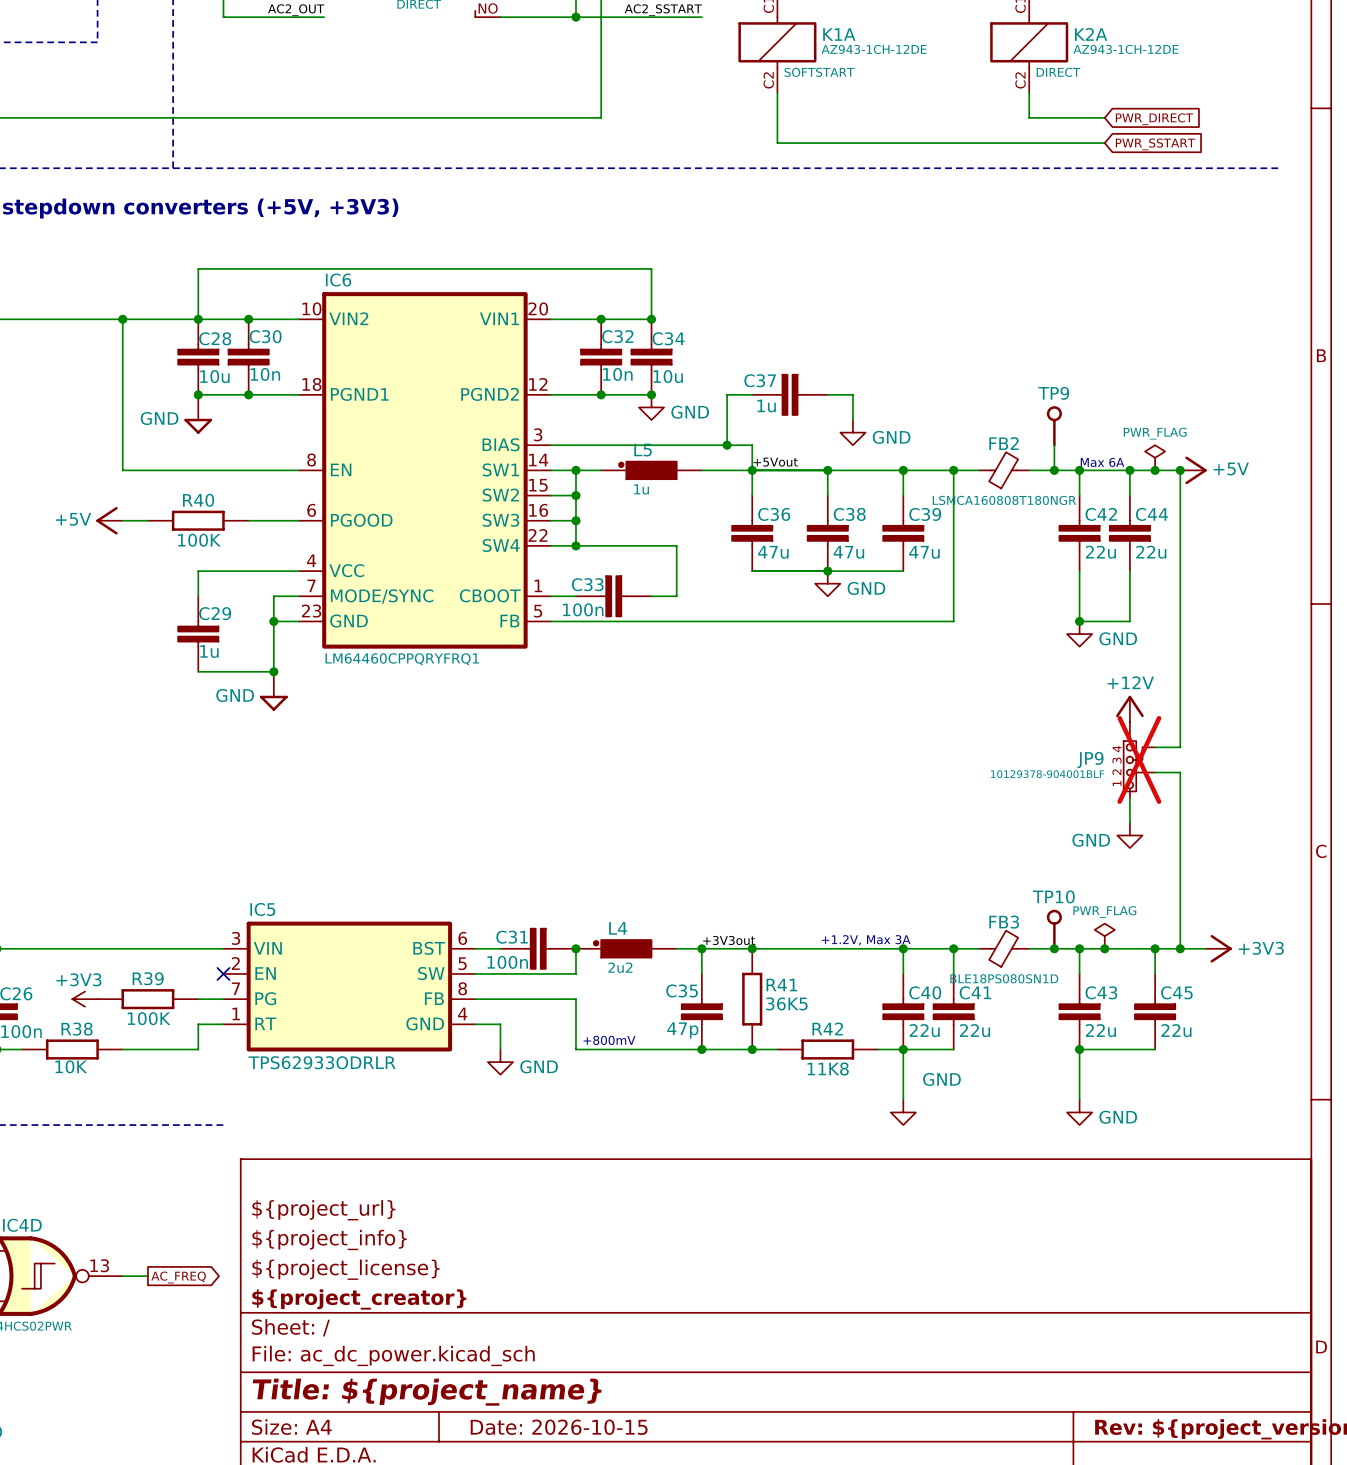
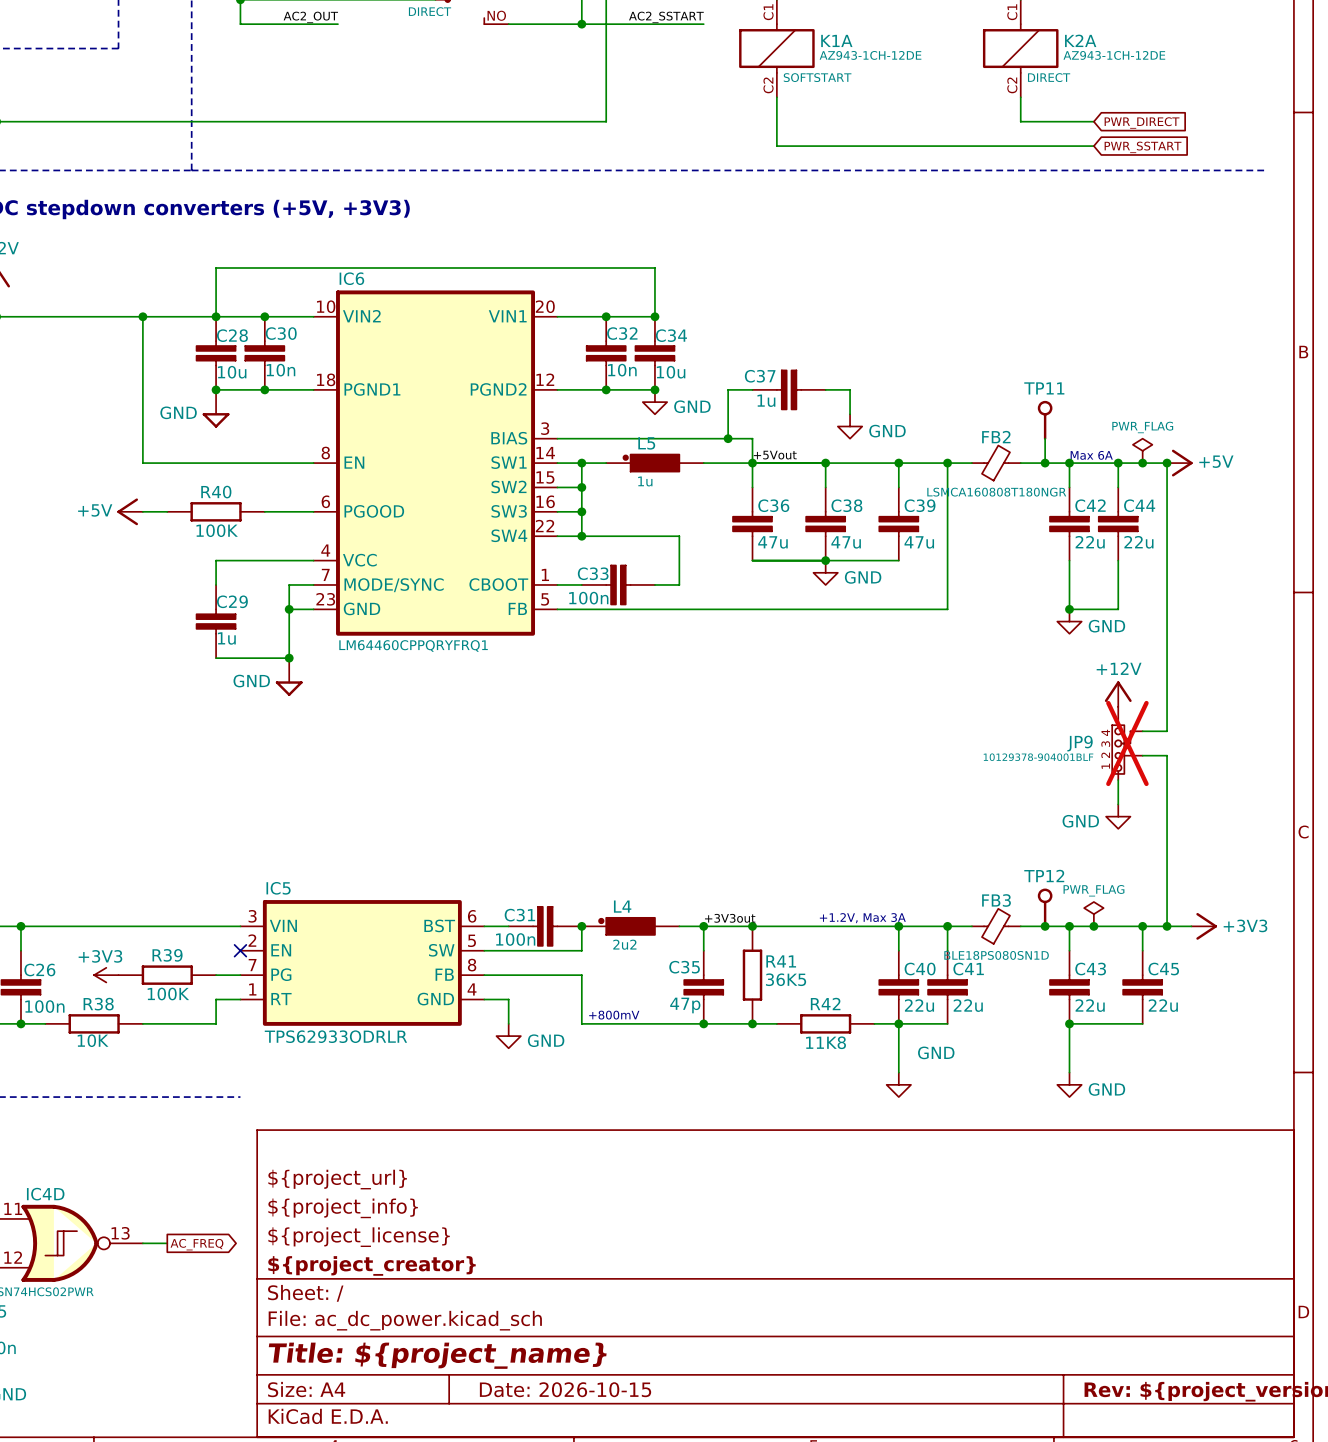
TP9 name: TP9 (1053, 393) -> TP11 (1044, 388)
TP10 name: TP10 (1053, 896) -> TP12 (1044, 875)

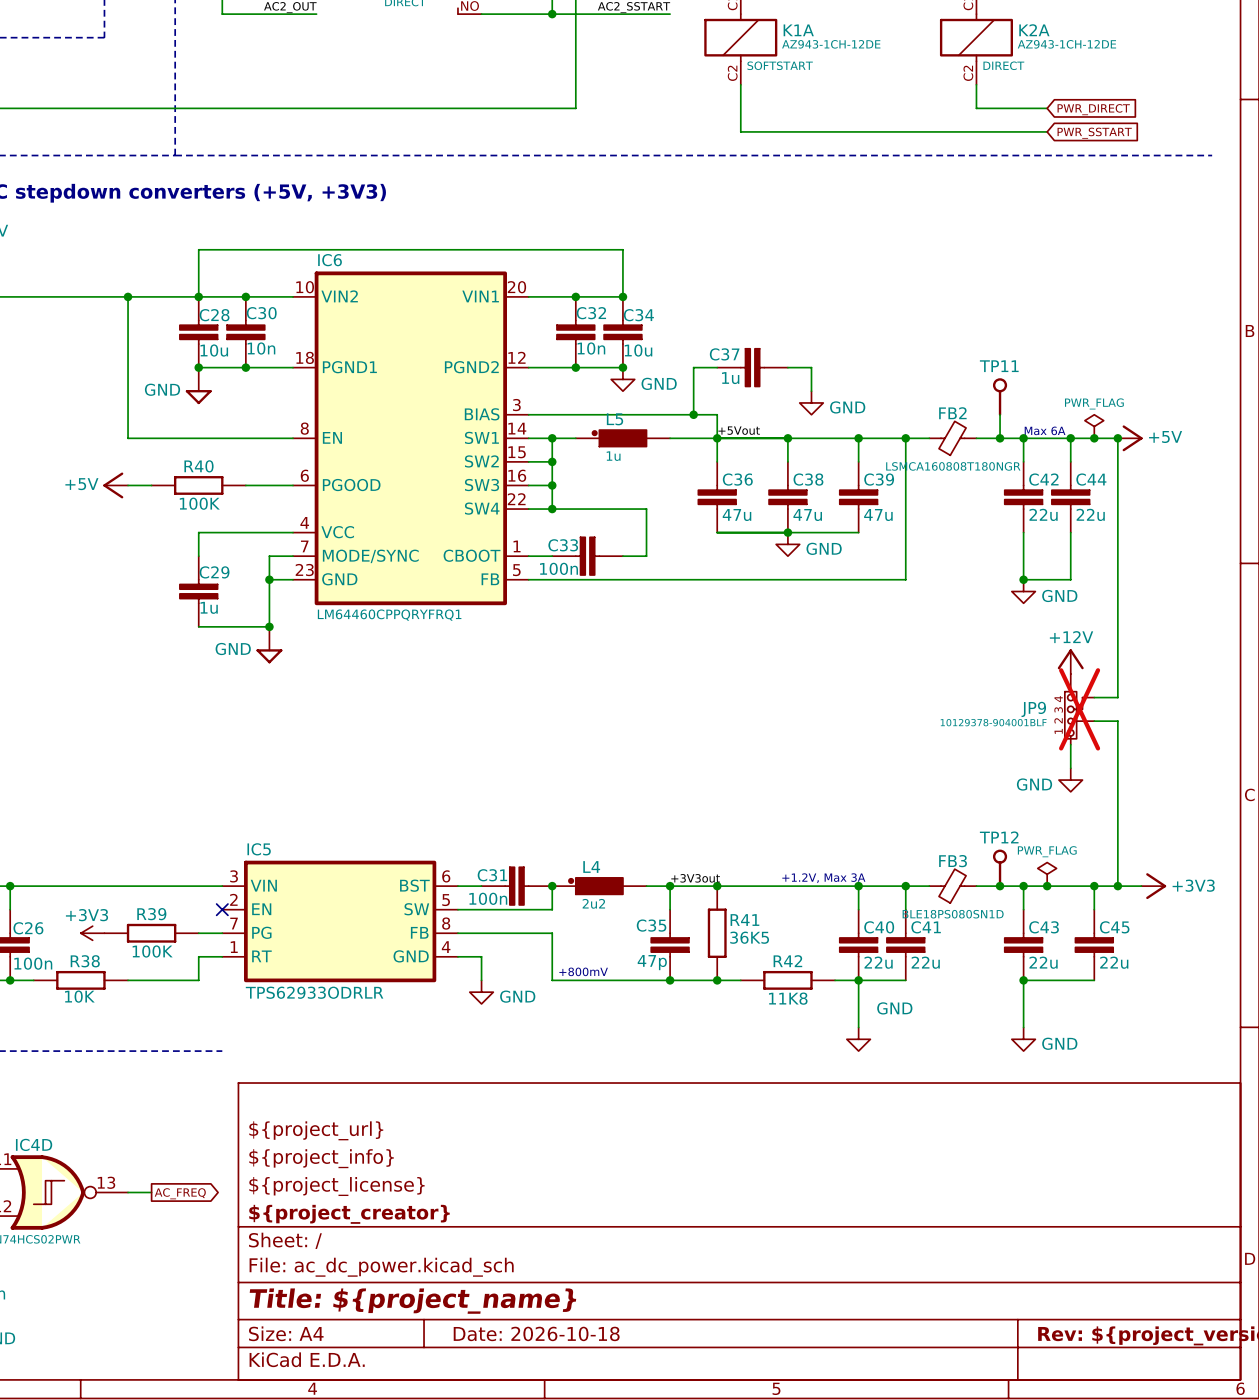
title block: Date: 2026-10-15 (565, 1389) -> Date: 2026-10-18 (536, 1333)

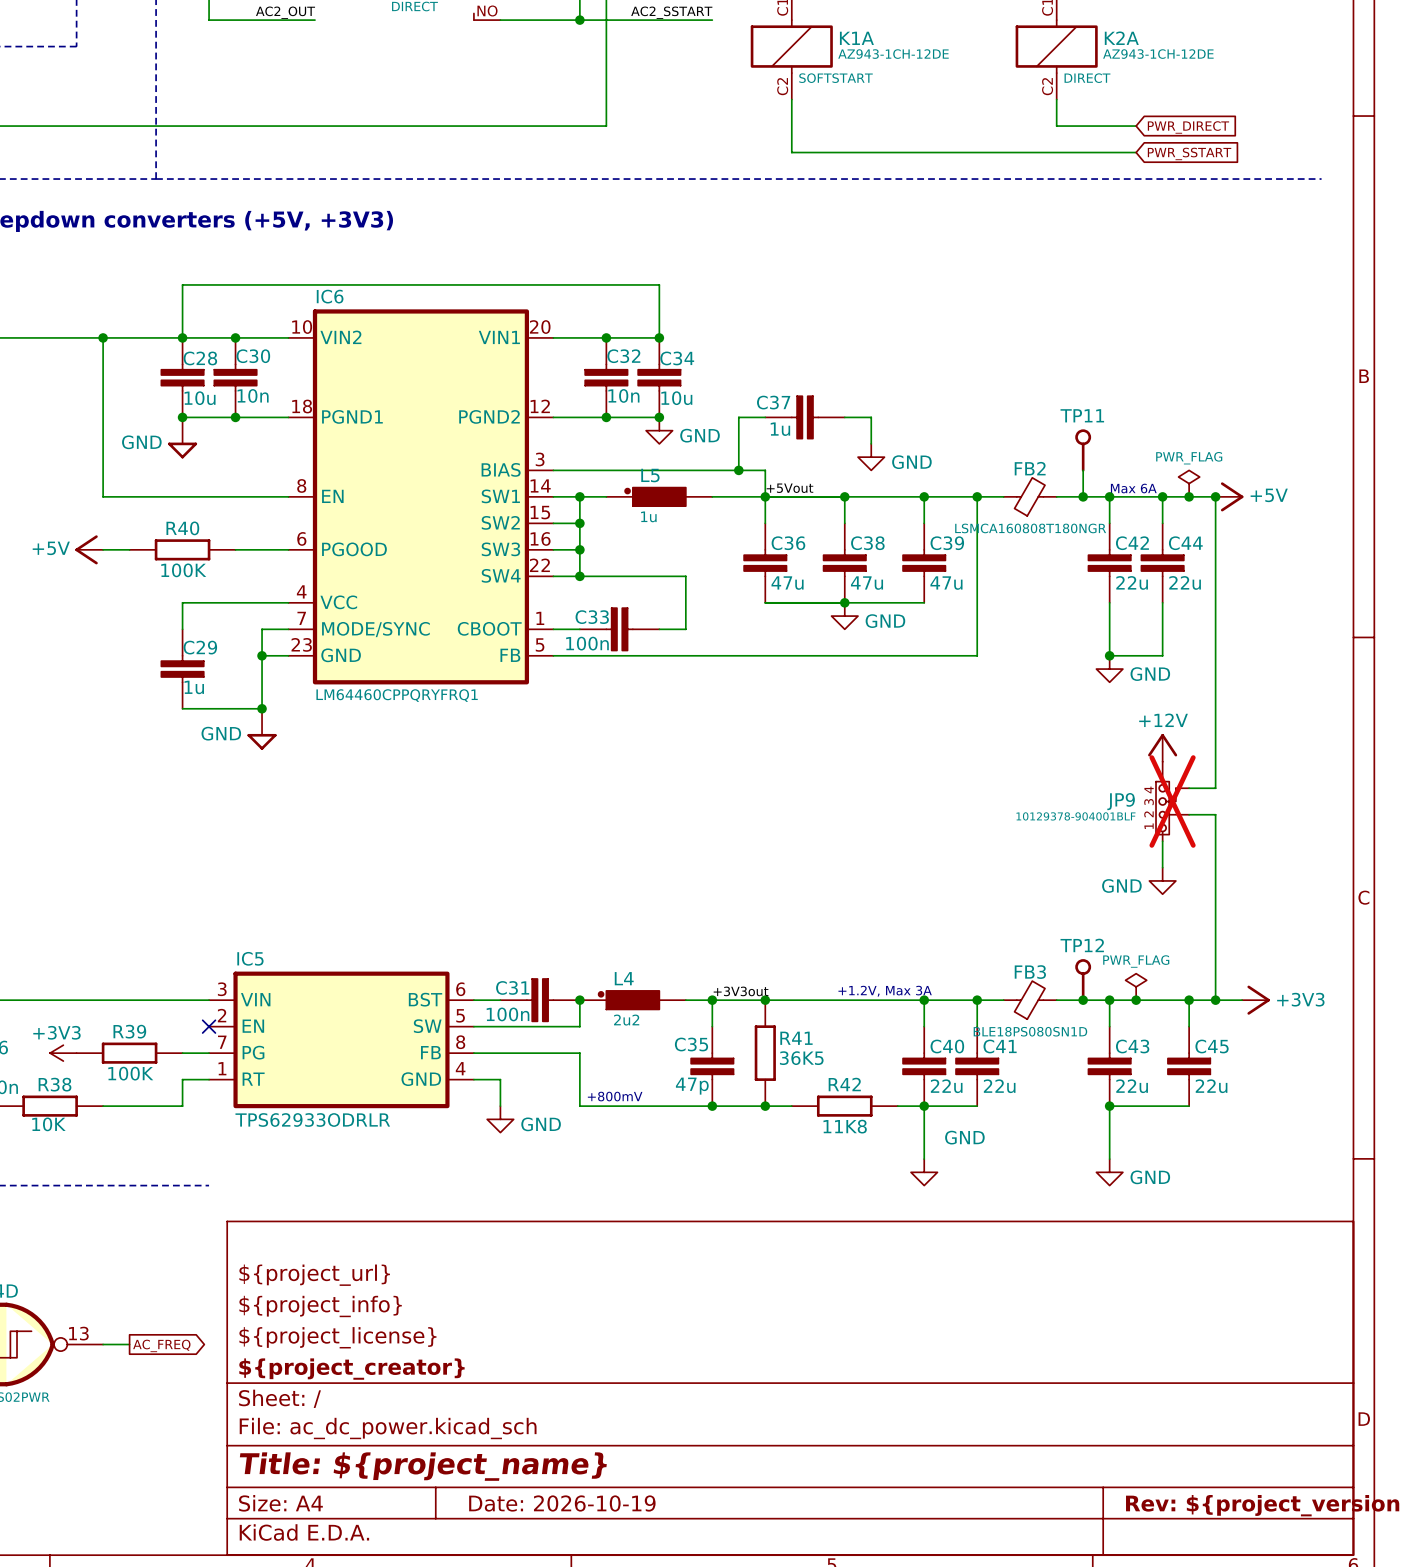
title block: Date: 2026-10-18 (536, 1333) -> Date: 2026-10-19 (562, 1503)

